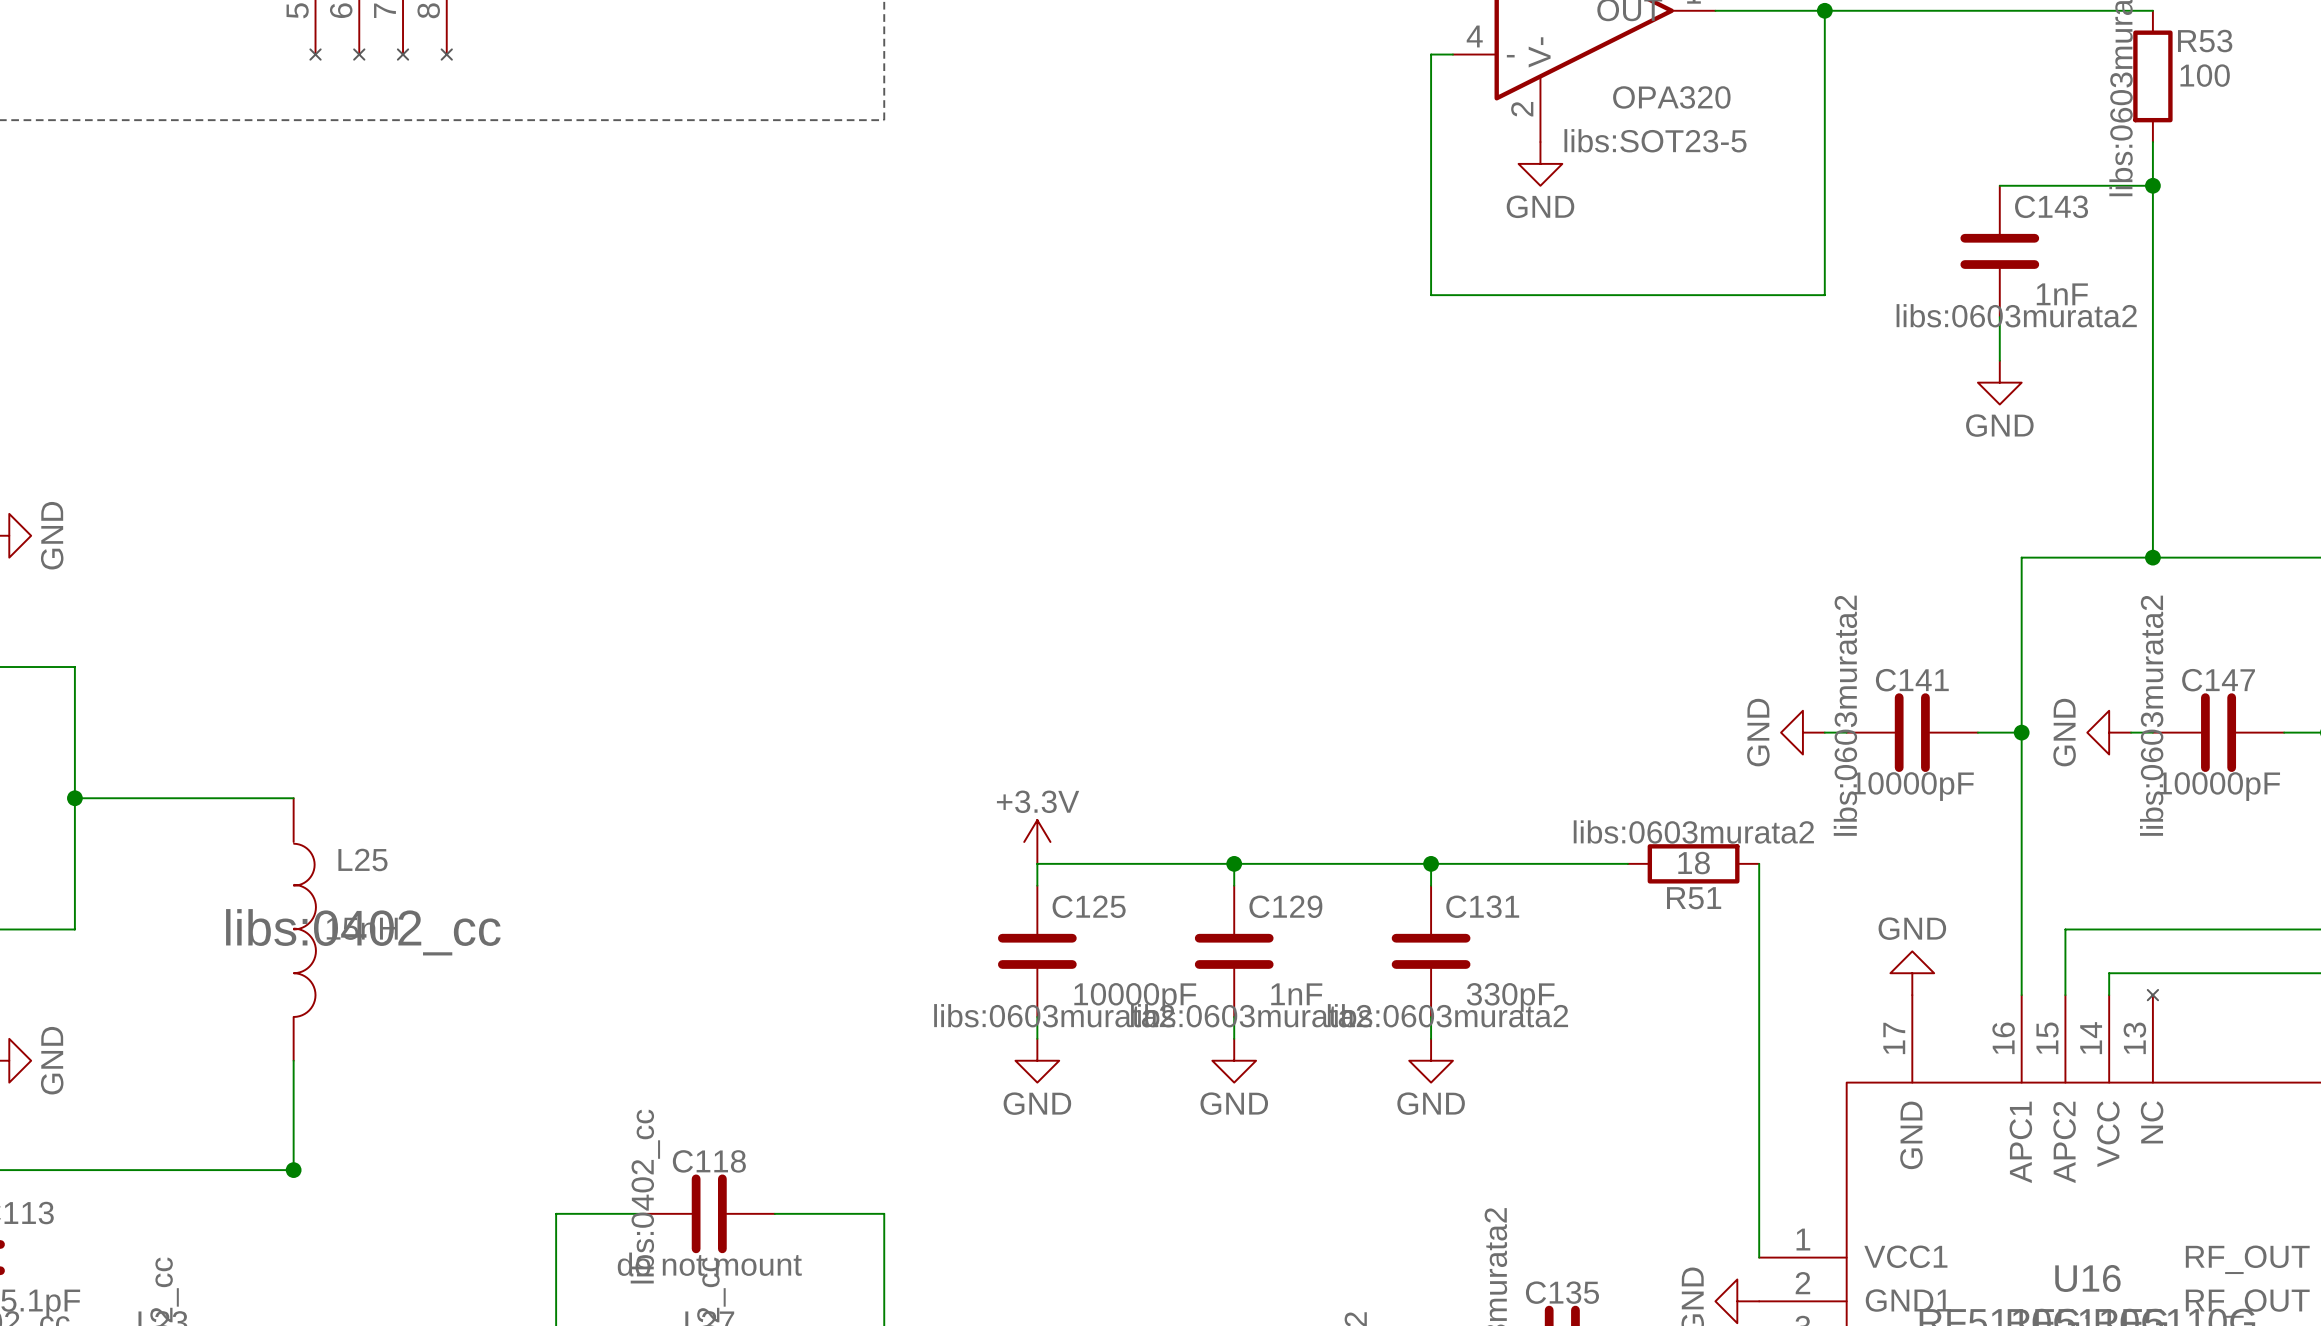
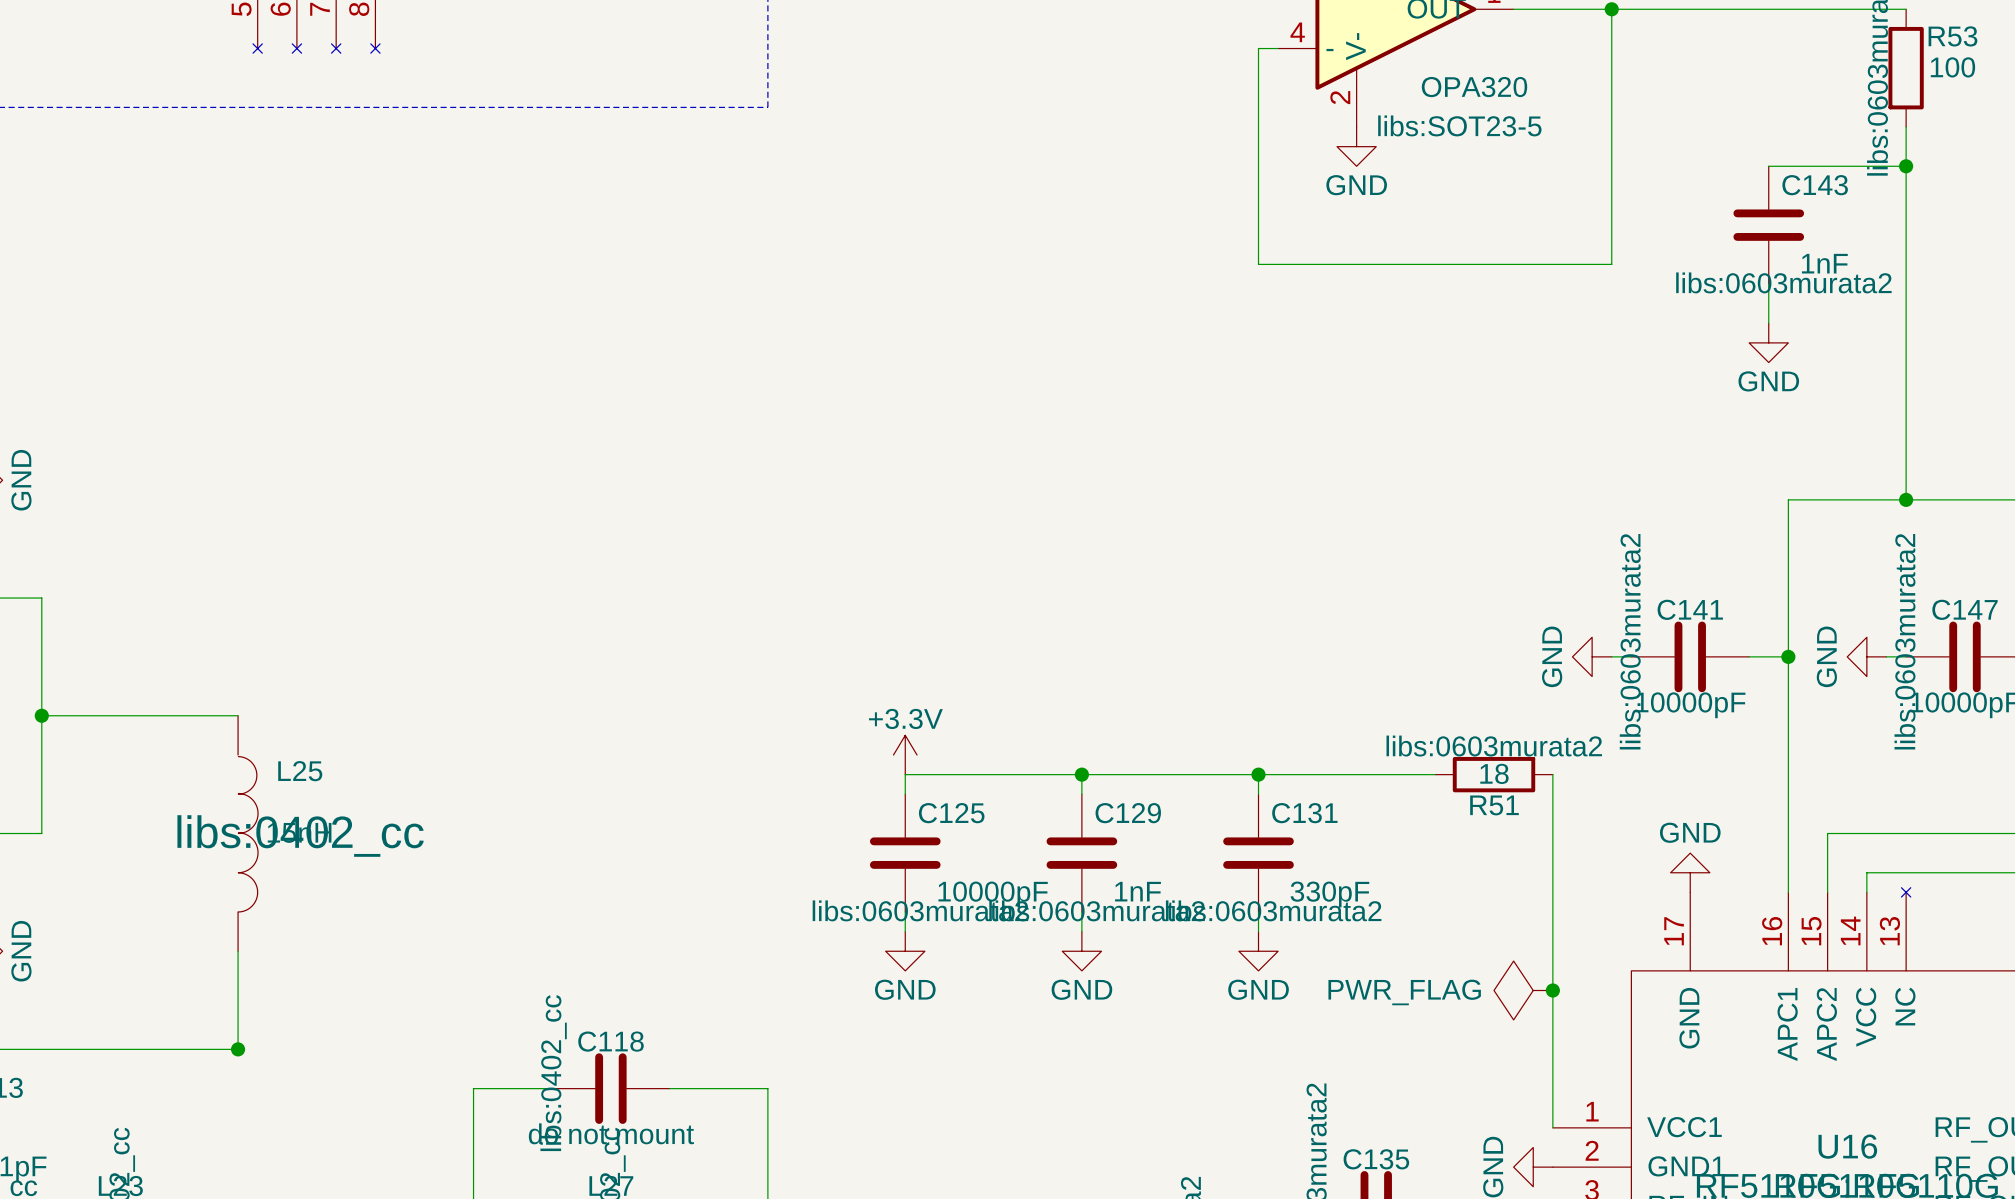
power symbol: none -> PWR_FLAG (1523, 990)
junction: none -> (1552, 990)

